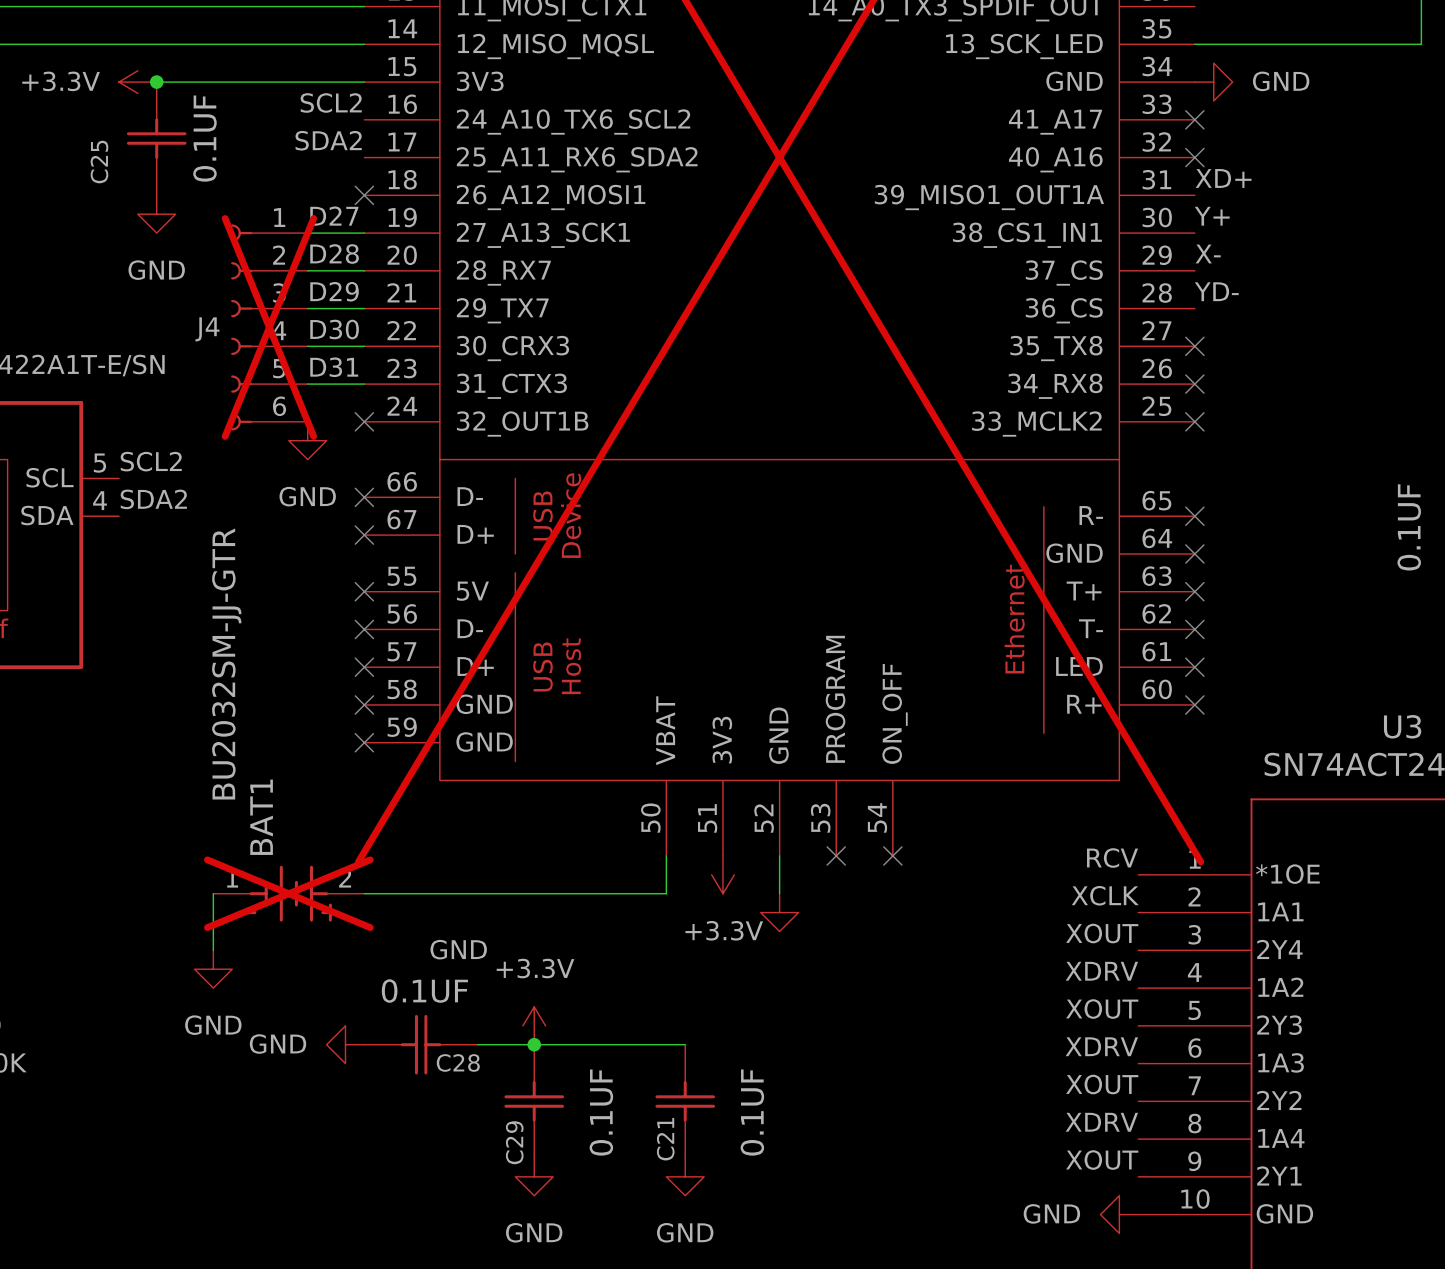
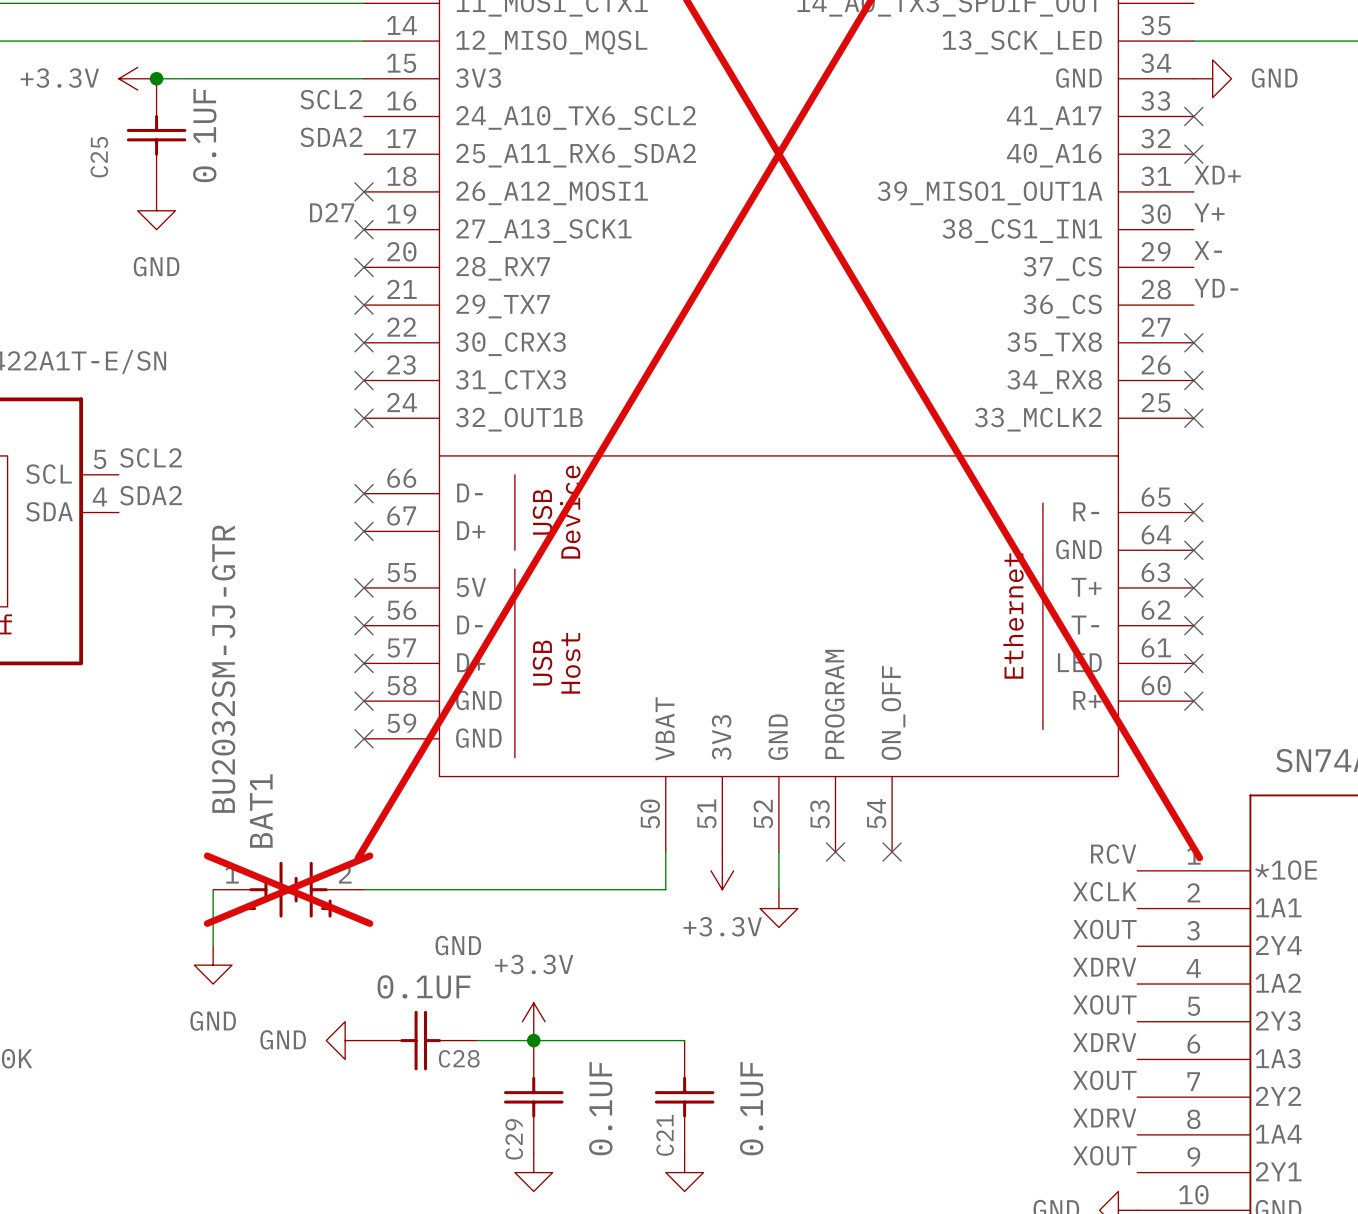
wire: (307, 233) (364, 233) -> none
no-connect mark: none -> (364, 229)
label: D28 (334, 254) -> none
wire: (307, 270) (364, 270) -> none
no-connect mark: none -> (364, 267)
label: D29 (334, 291) -> none
wire: (307, 308) (364, 308) -> none
no-connect mark: none -> (364, 305)
J4: (269, 327) -> none
label: D30 (334, 329) -> none
wire: (307, 346) (364, 346) -> none
no-connect mark: none -> (364, 342)
label: D31 (334, 367) -> none
wire: (307, 384) (364, 384) -> none
no-connect mark: none -> (364, 380)
power symbol: GND (307, 440) -> none

